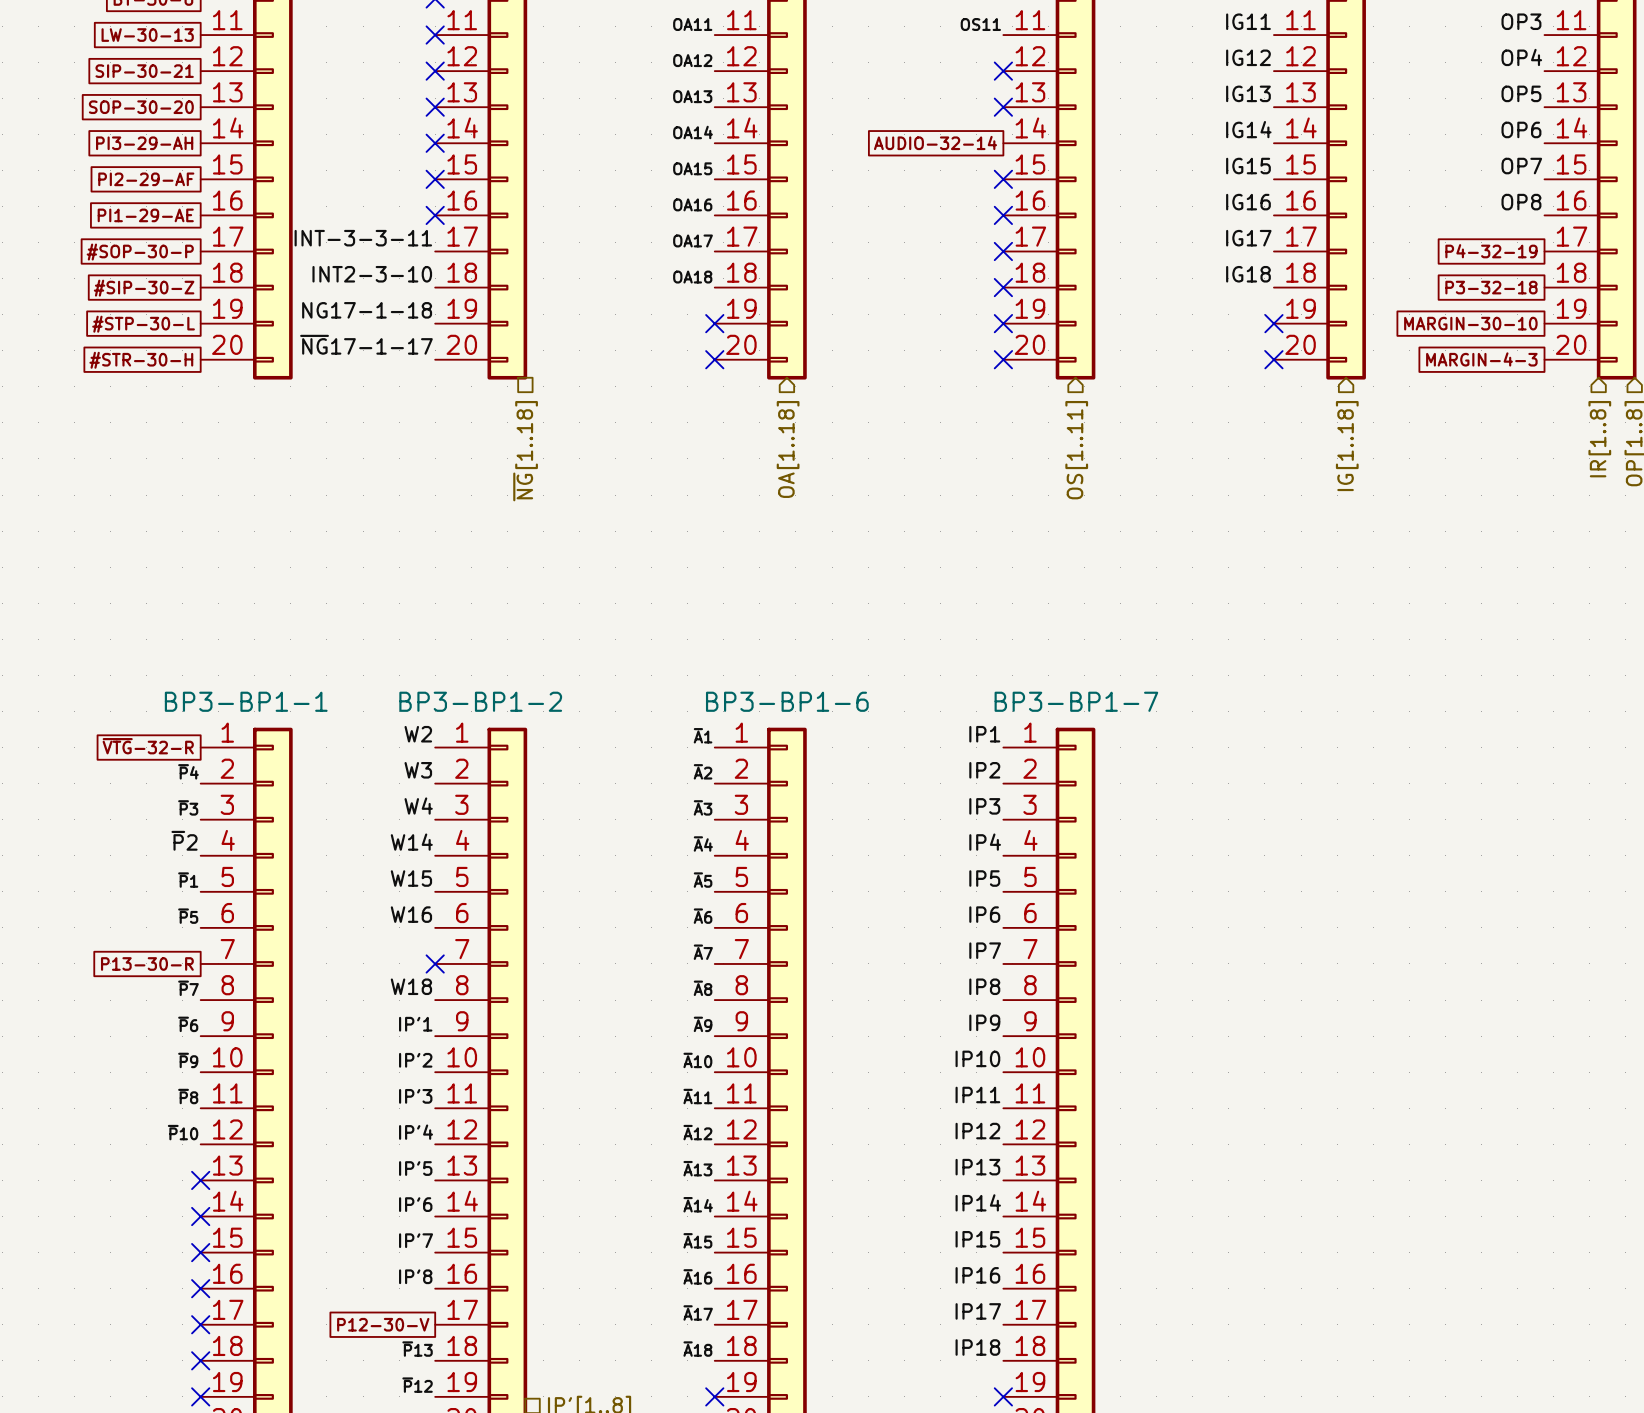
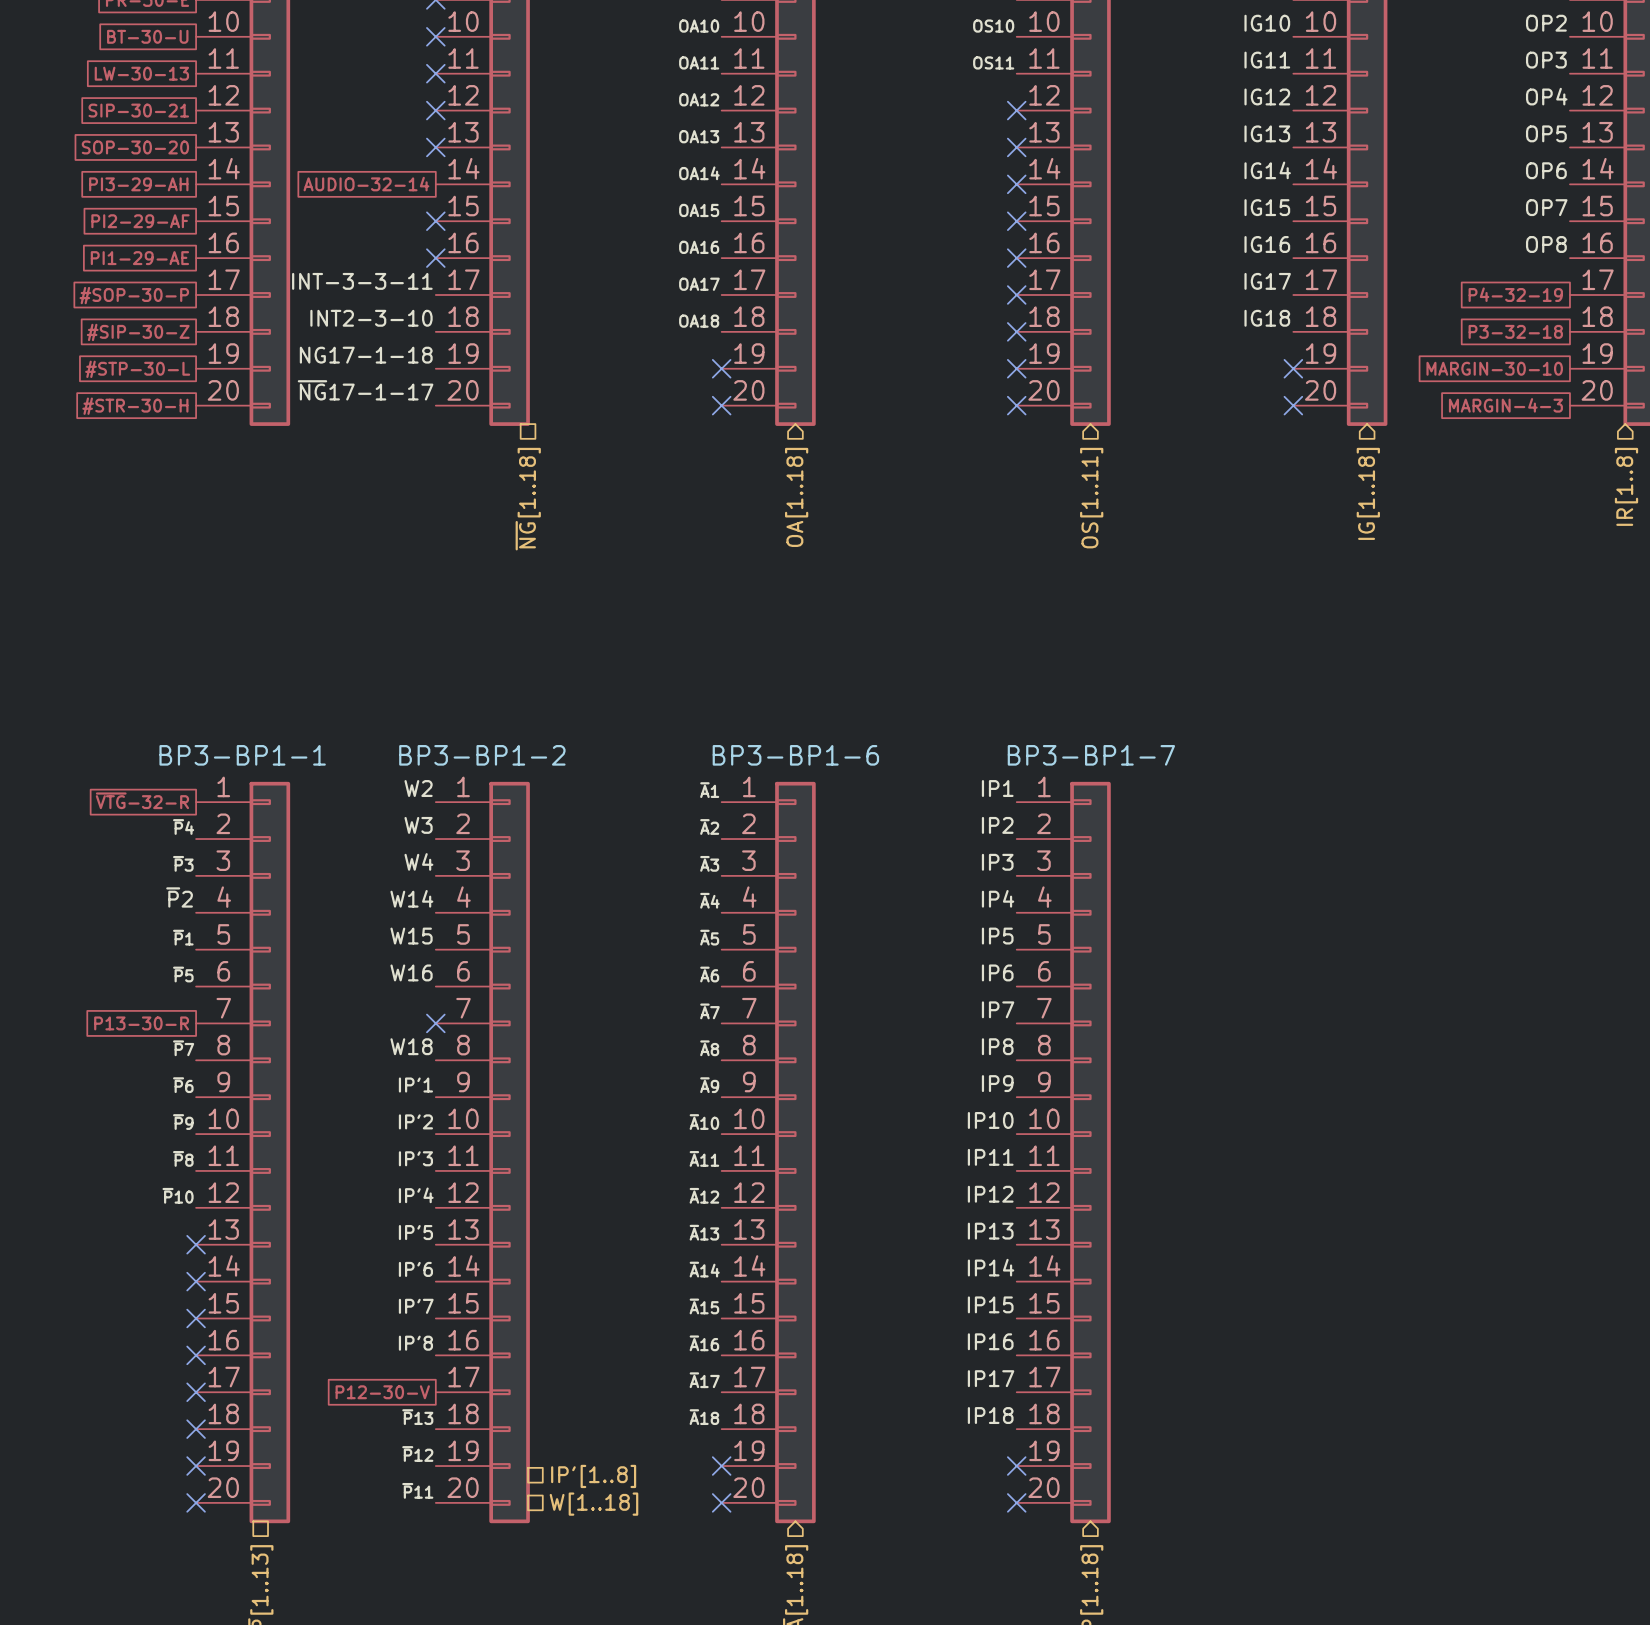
global label: none -> AUDIO-32-14 (366, 184)
global label: AUDIO-32-14 (935, 142) -> none
no-connect mark: (435, 143) -> none
no-connect mark: none -> (1016, 184)

